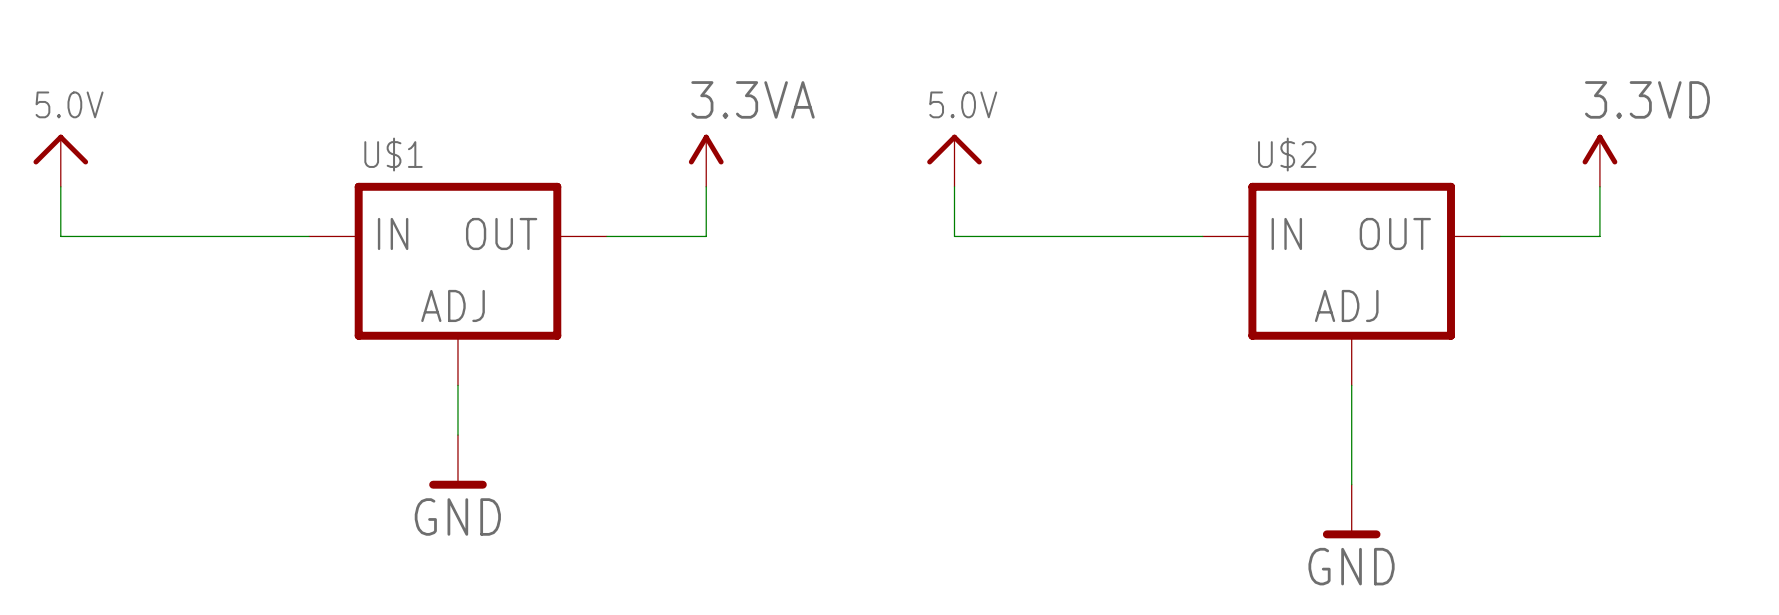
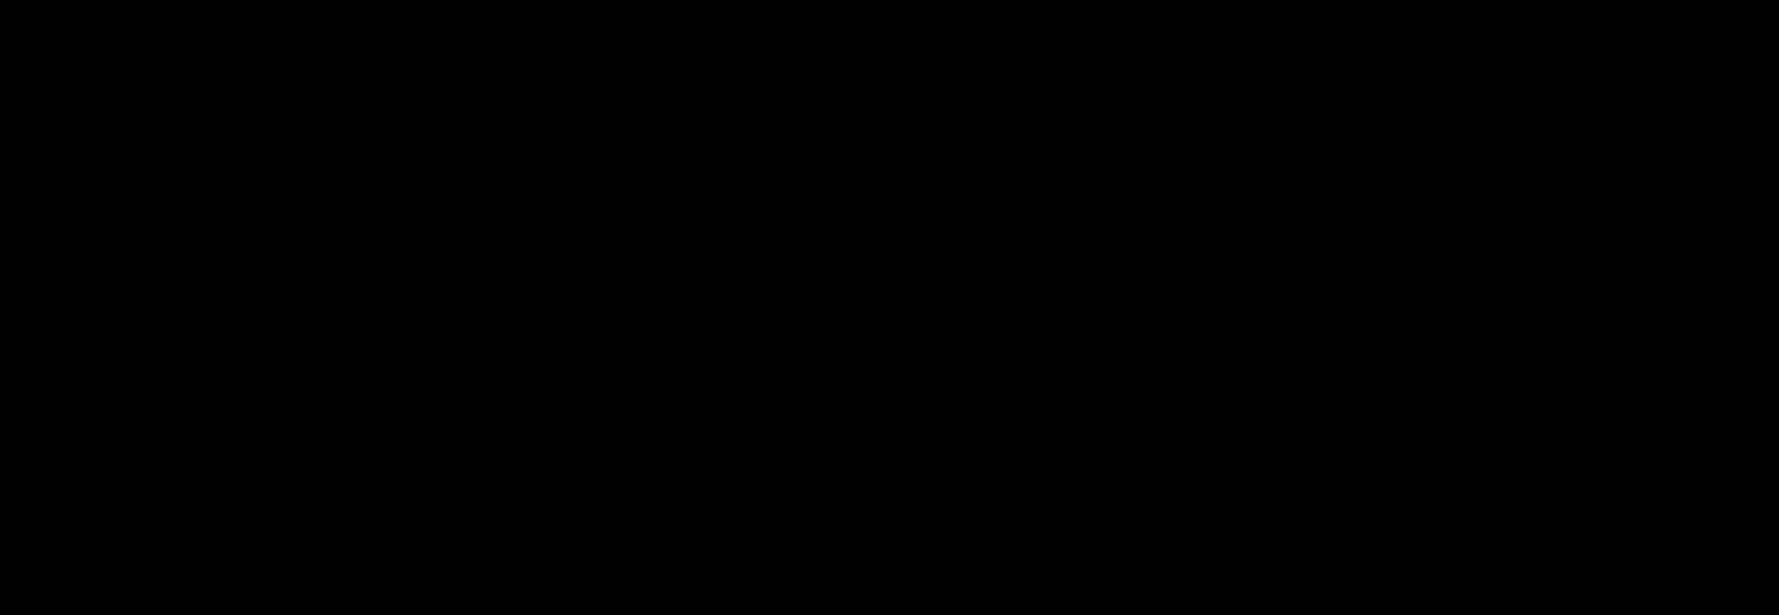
power symbol: 5.0V (60, 160) -> none
power symbol: 3.3VA (706, 160) -> none
power symbol: 5.0V (954, 160) -> none
power symbol: 3.3VD (1599, 160) -> none
wire: (60, 186) (60, 236) (309, 236) -> none
wire: (706, 186) (706, 236) (606, 236) -> none
wire: (954, 186) (954, 236) (1202, 236) -> none
wire: (1599, 186) (1599, 236) (1500, 236) -> none
U$1: (457, 284) -> none
U$2: (1351, 284) -> none
wire: (457, 385) (457, 435) -> none
wire: (1351, 385) (1351, 484) -> none
power symbol: GND (457, 461) -> none
power symbol: GND (1351, 511) -> none

